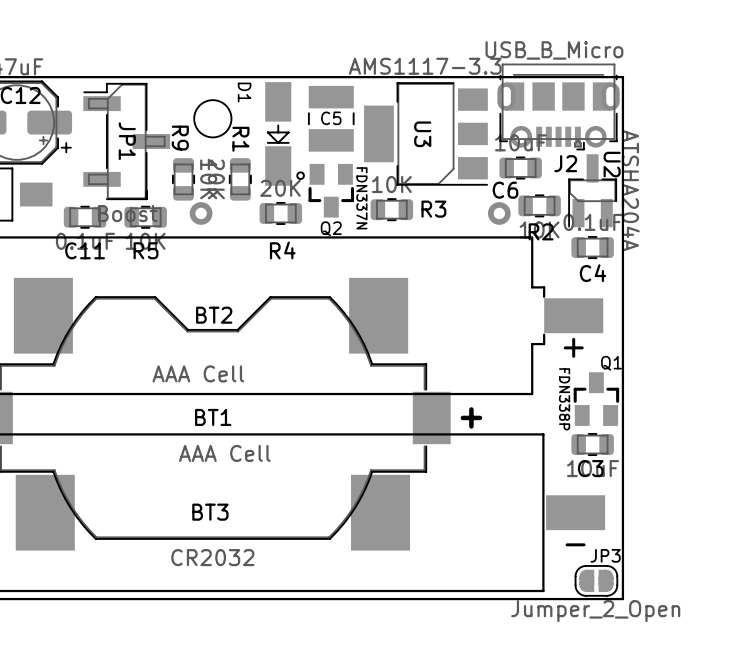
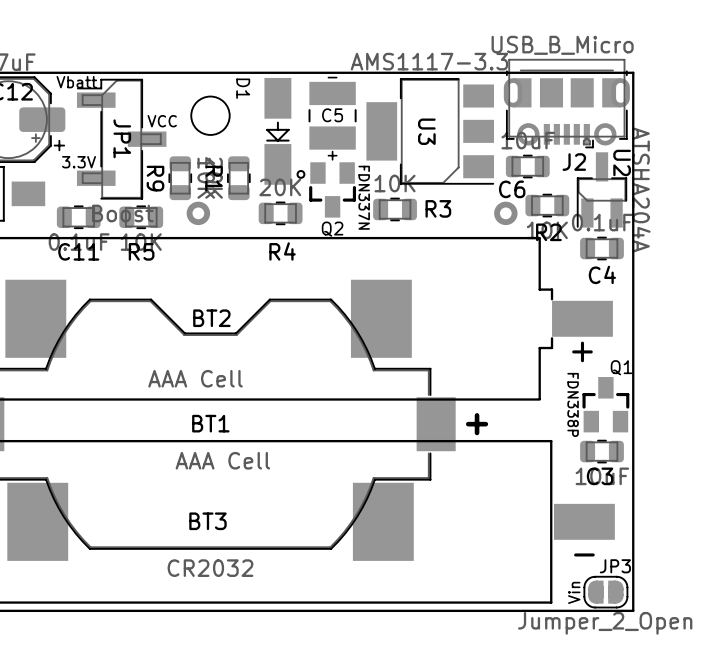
text: none -> - (332, 77)
text: none -> Vbatt (76, 82)
text: none -> VCC (162, 121)
R9 name position: R9 (180, 138) -> R9 (155, 178)
R1 name position: R1 (240, 139) -> R1 (214, 178)
text: none -> + (332, 155)
text: none -> 3.3V (79, 162)
text: none -> Vin (574, 592)

